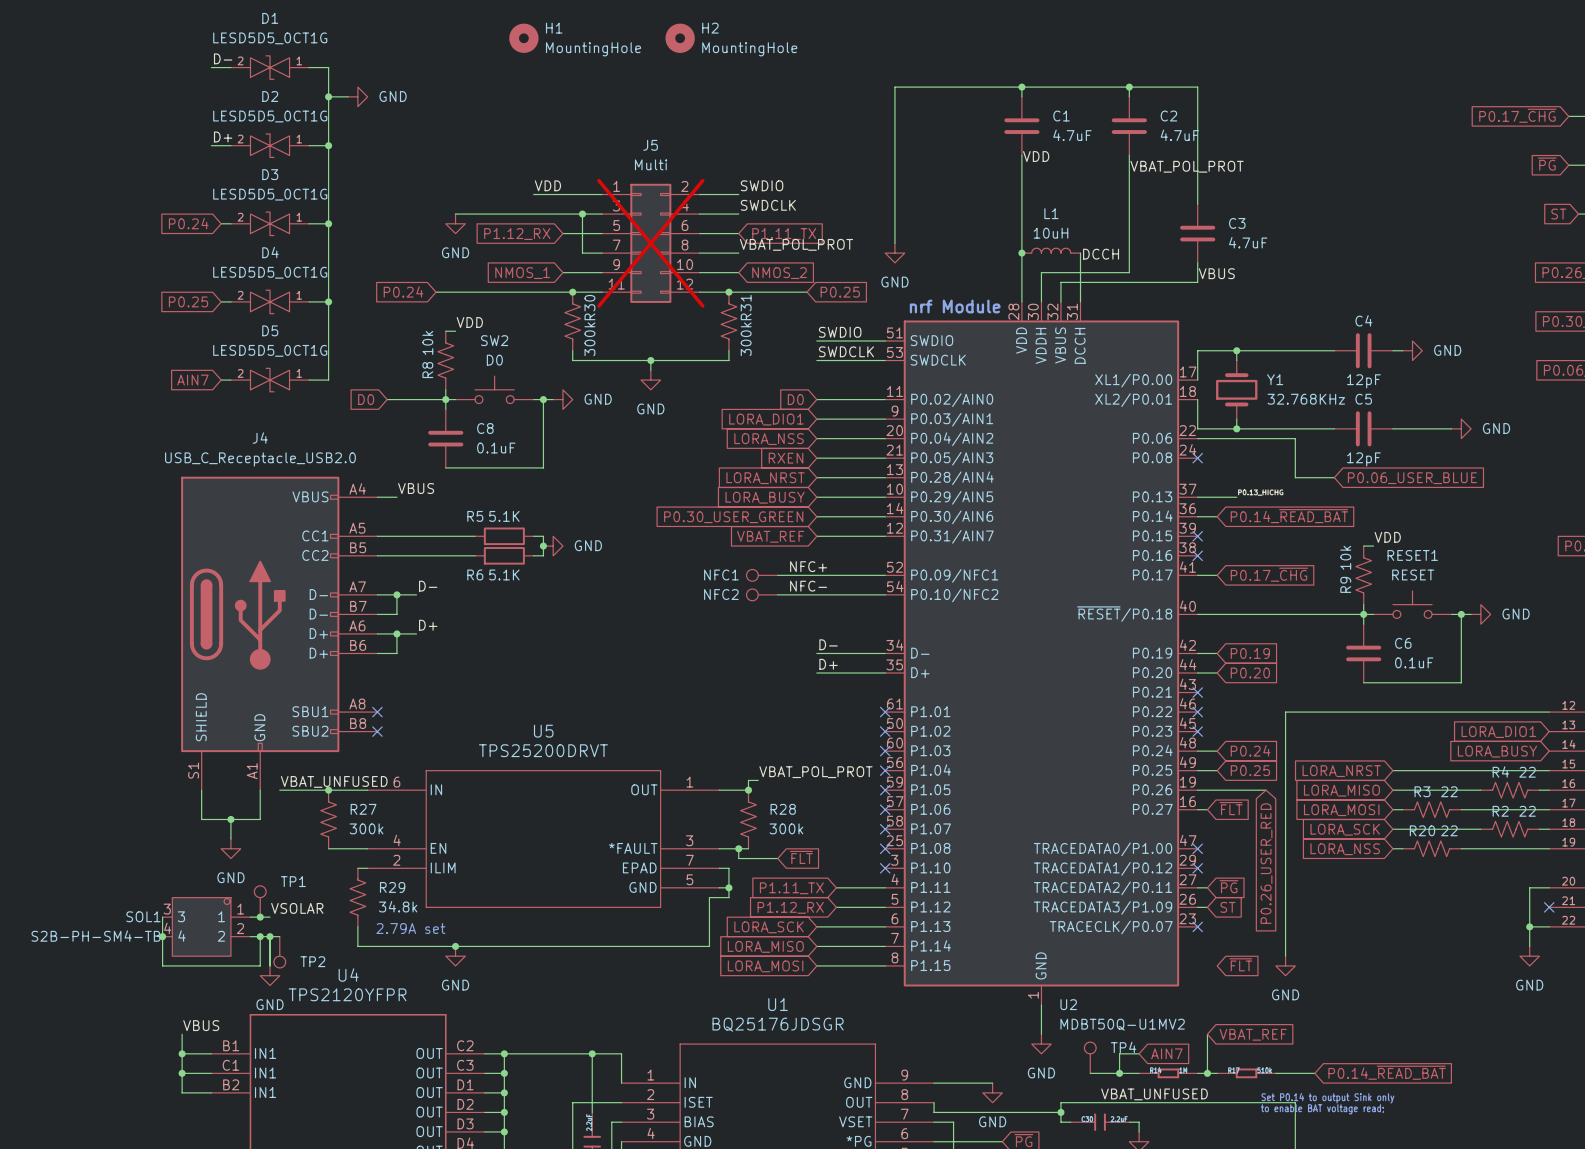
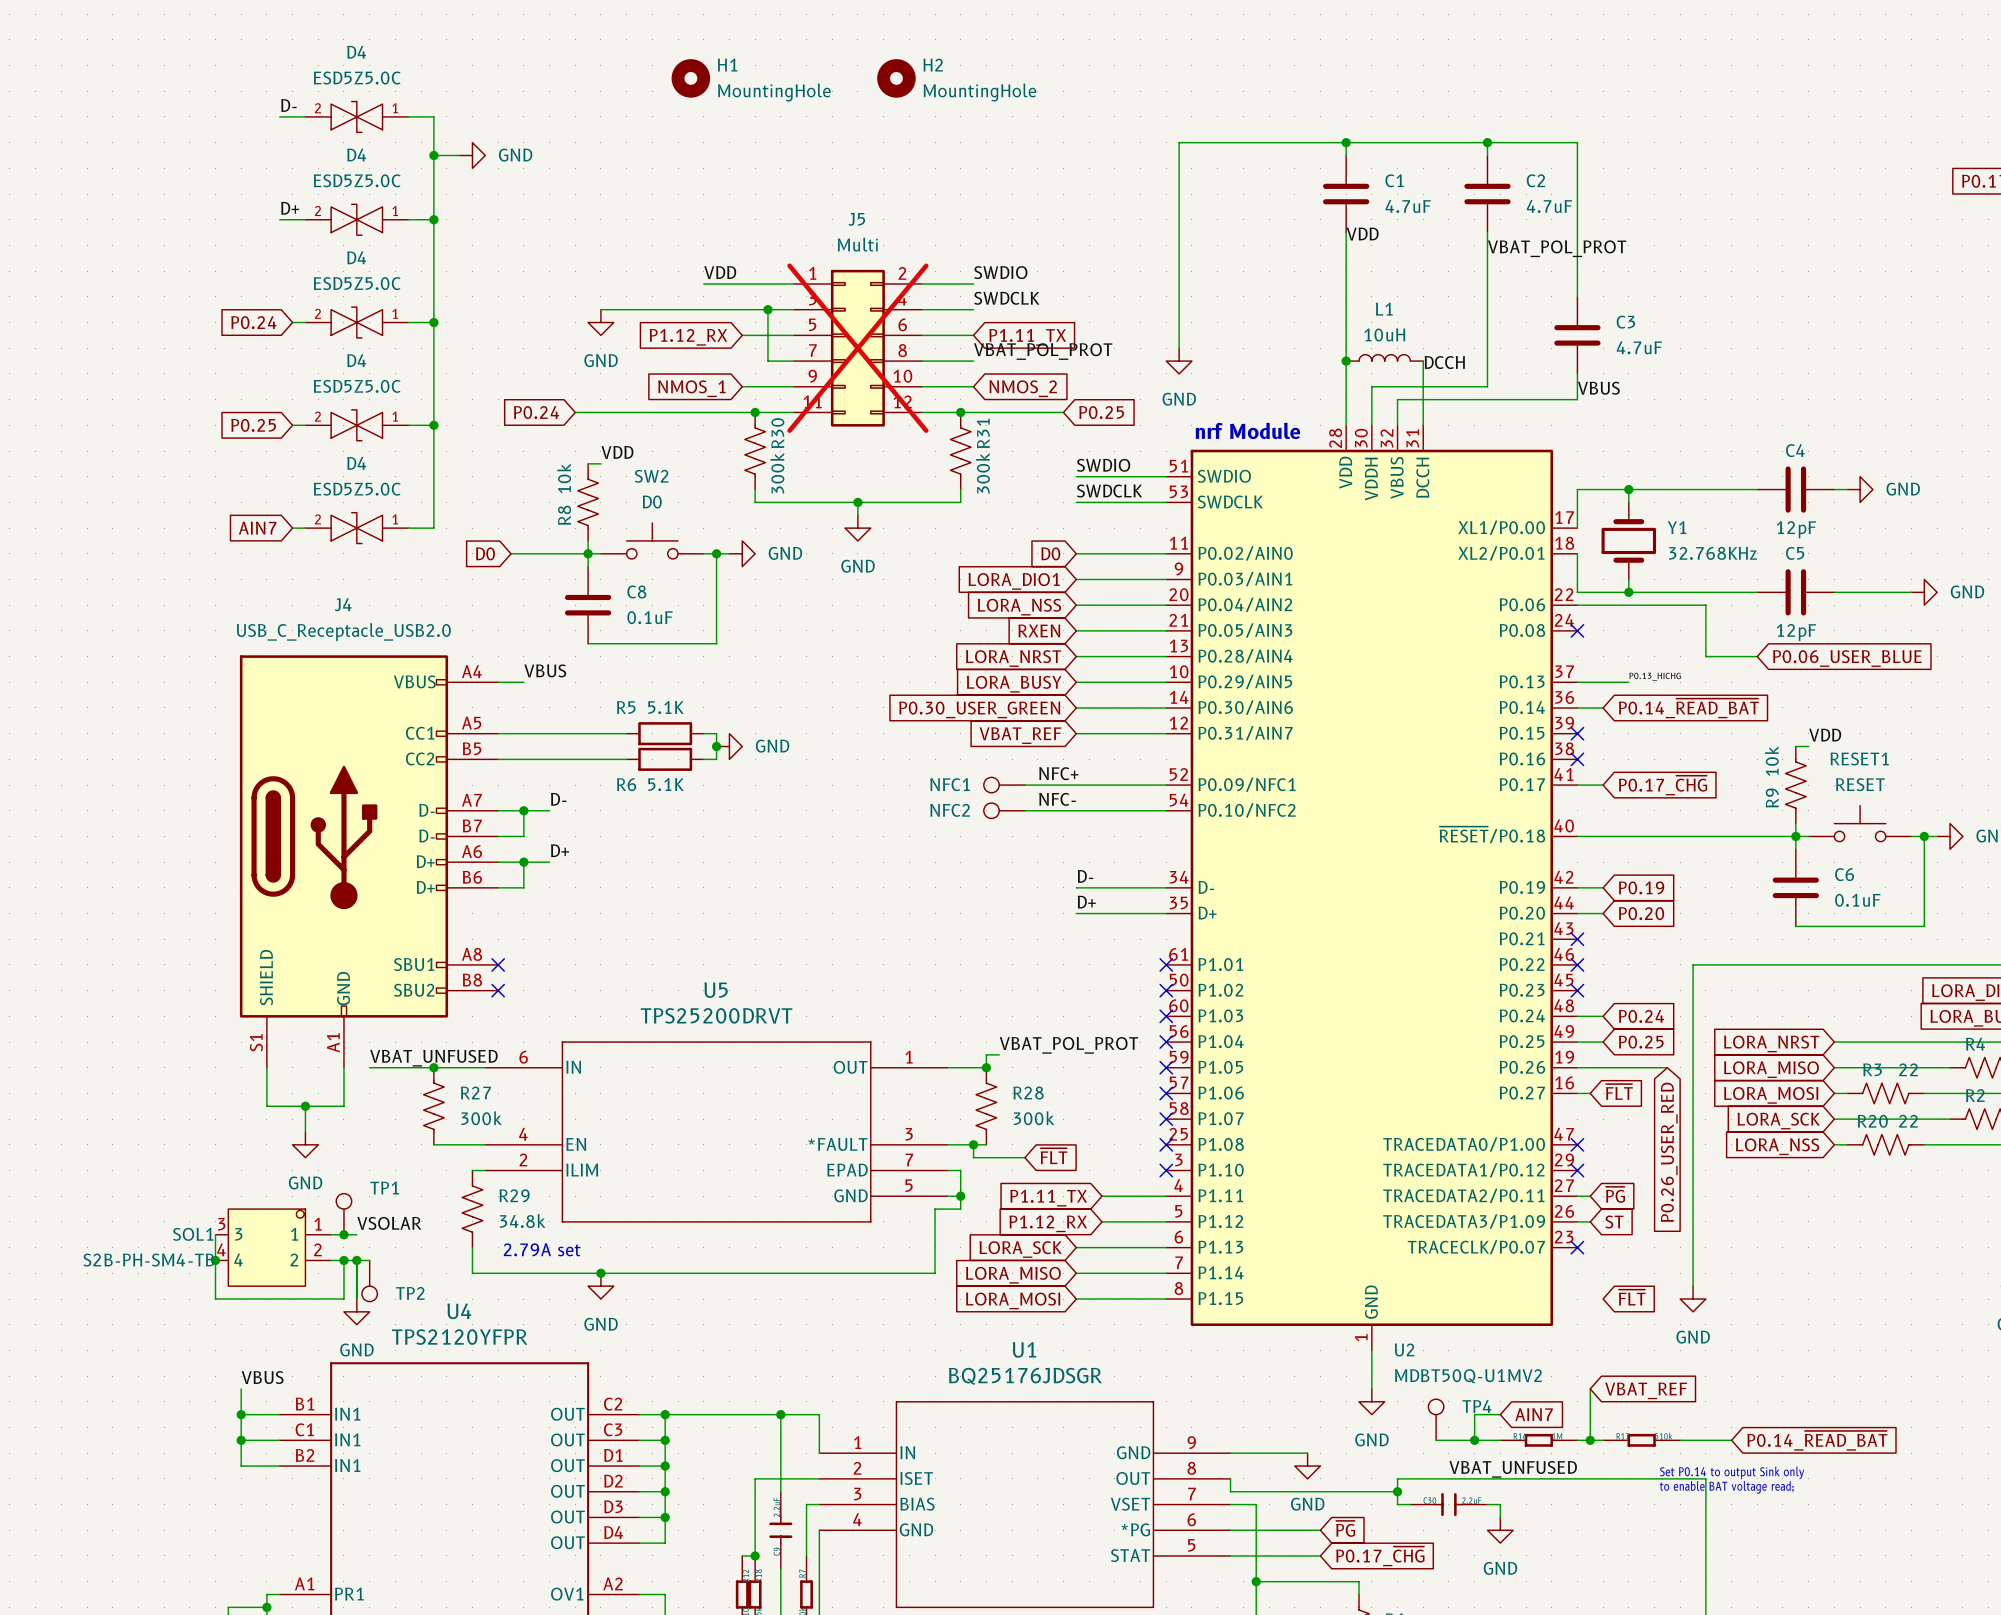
D1 name: D1 (270, 18) -> D4 (356, 52)
D1 value: LESD5D5_0CT1G (270, 38) -> ESD5Z5.0C (357, 78)
D2 name: D2 (270, 96) -> D4 (356, 155)
D2 value: LESD5D5_0CT1G (270, 116) -> ESD5Z5.0C (357, 180)
D3 name: D3 (270, 174) -> D4 (356, 257)
D3 value: LESD5D5_0CT1G (270, 194) -> ESD5Z5.0C (357, 283)
D4 value: LESD5D5_0CT1G (270, 272) -> ESD5Z5.0C (357, 386)
D5 name: D5 (270, 330) -> D4 (356, 463)
D5 value: LESD5D5_0CT1G (270, 350) -> ESD5Z5.0C (357, 489)

